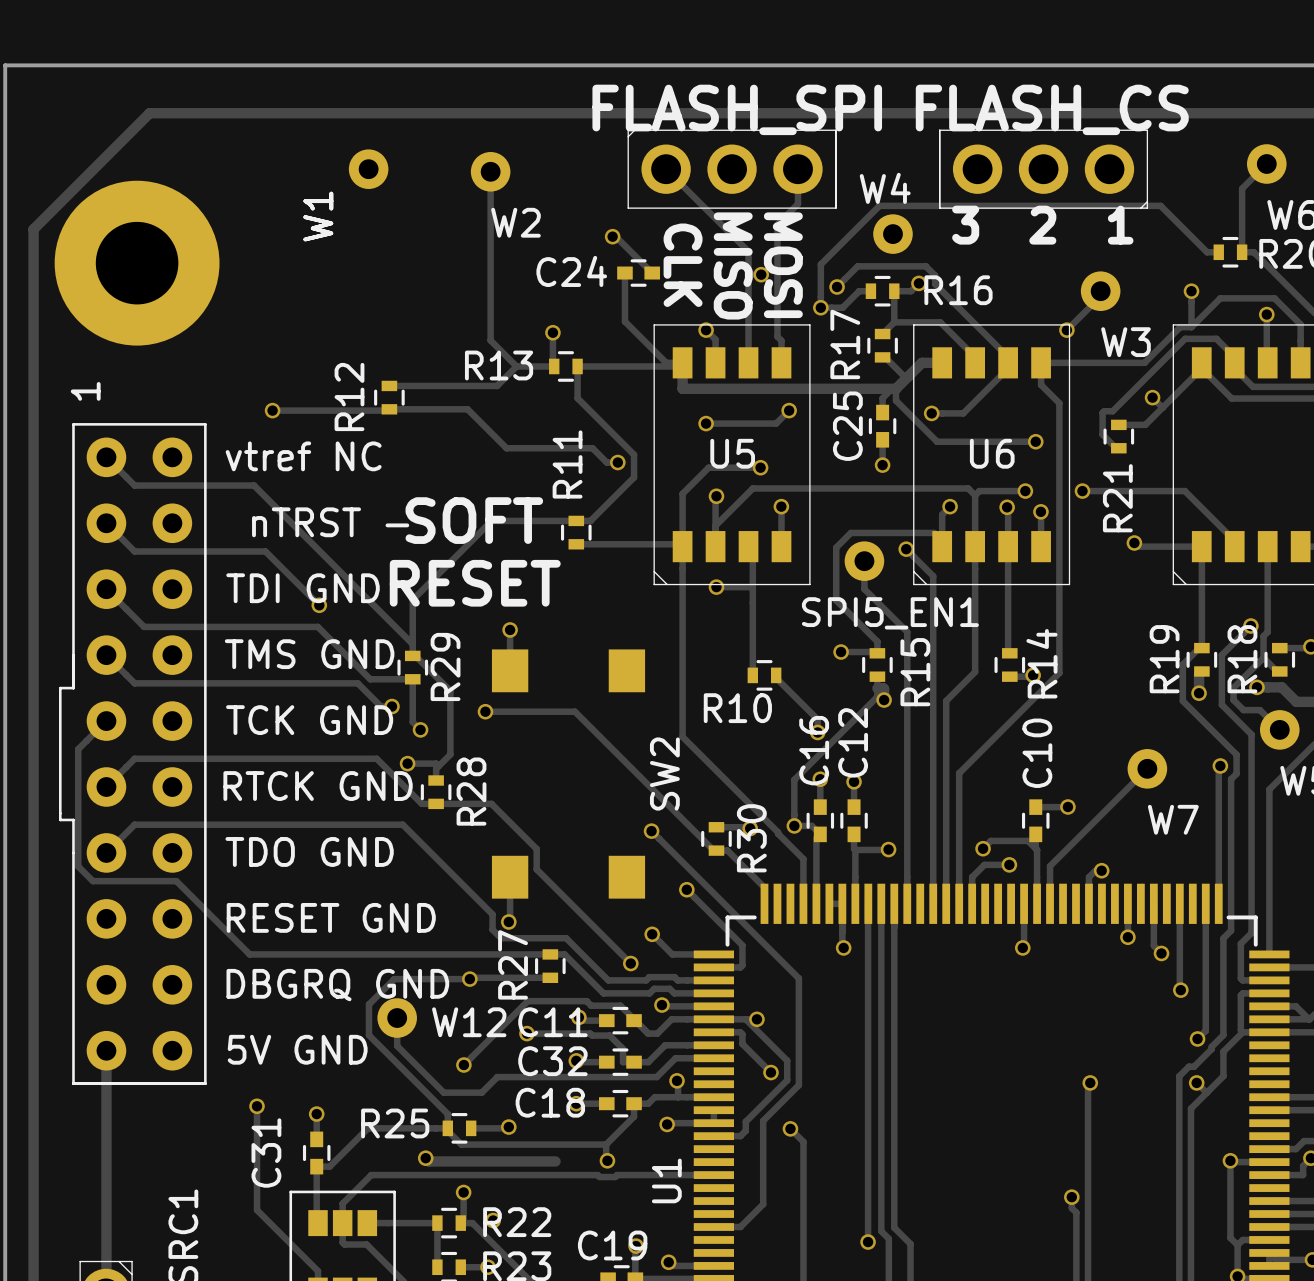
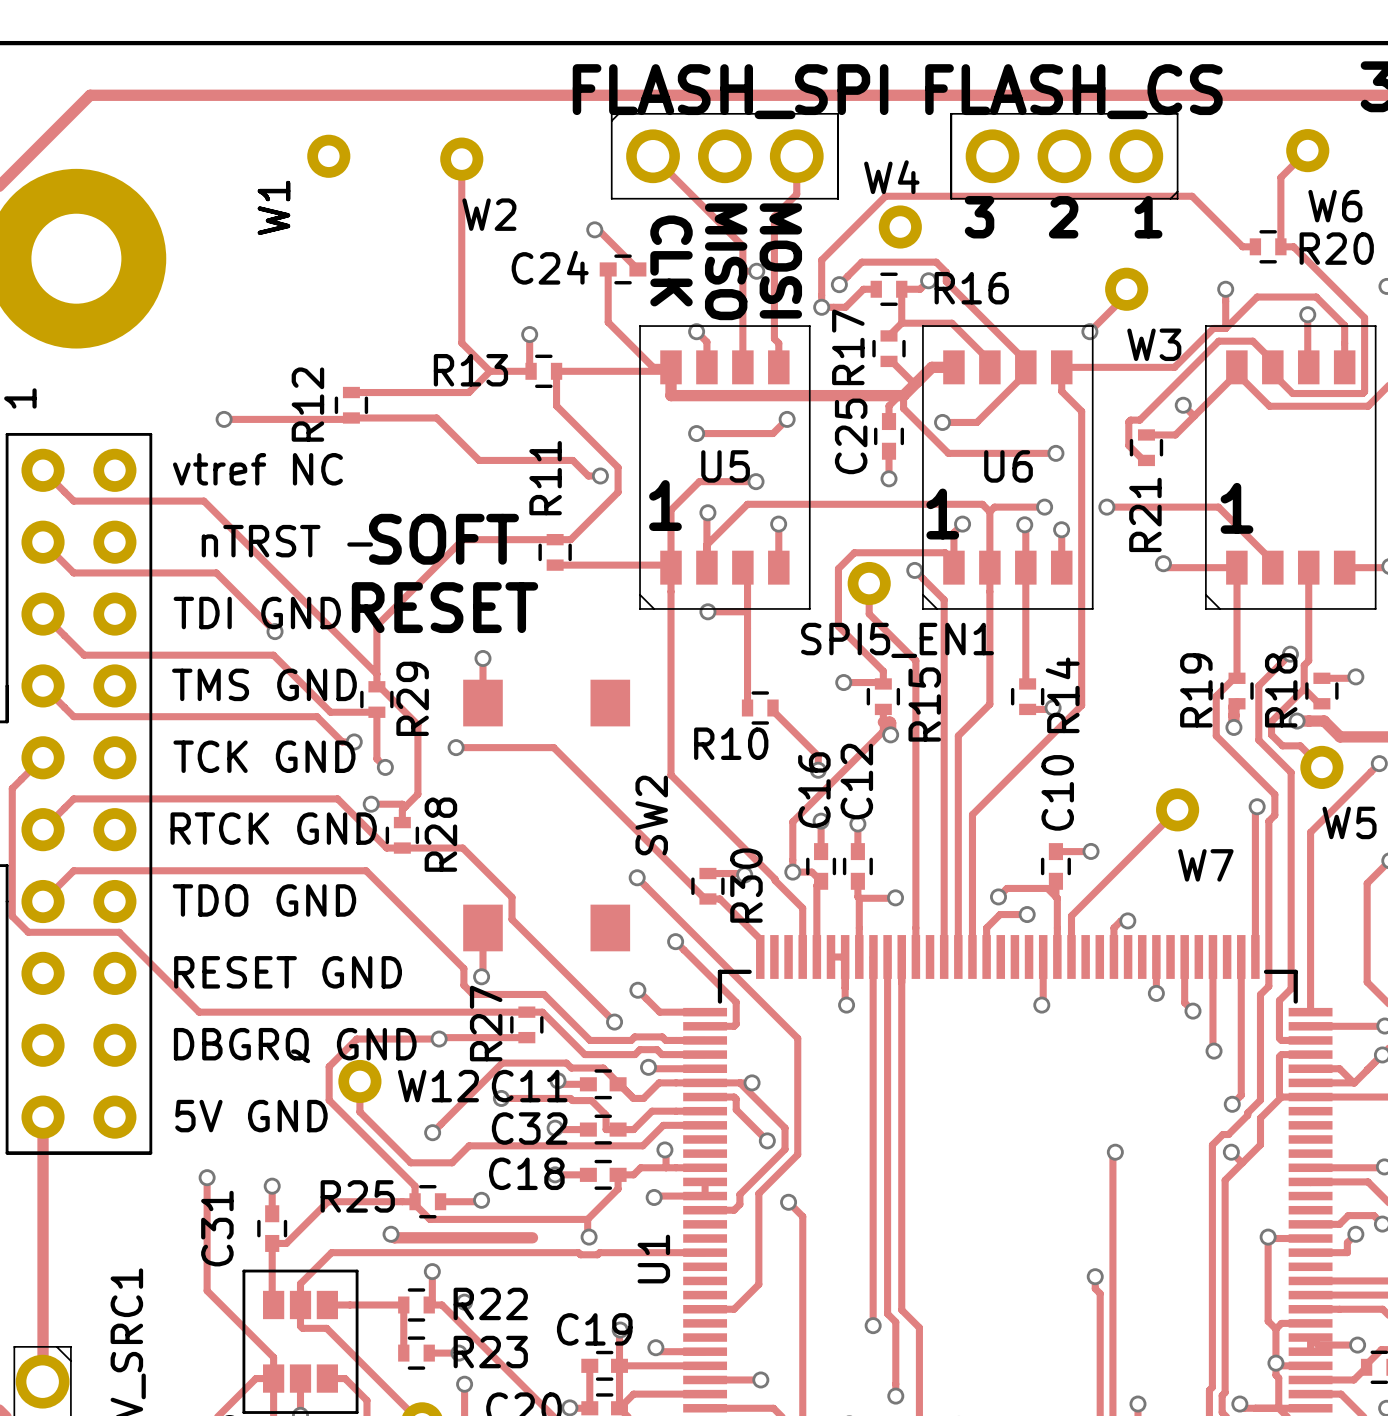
text: none -> 1 (665, 505)
text: none -> 1 (1237, 508)
text: none -> 1 (942, 514)

